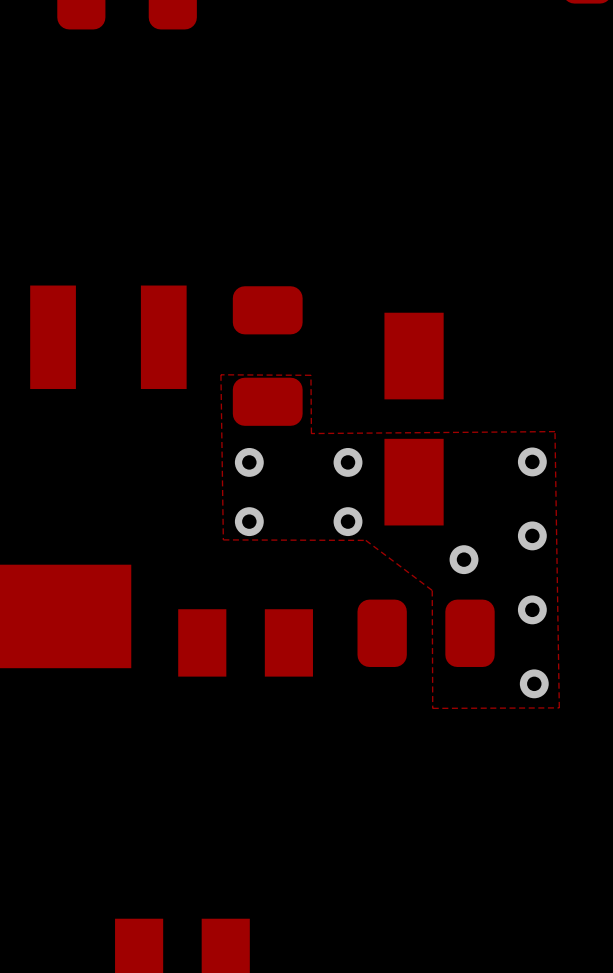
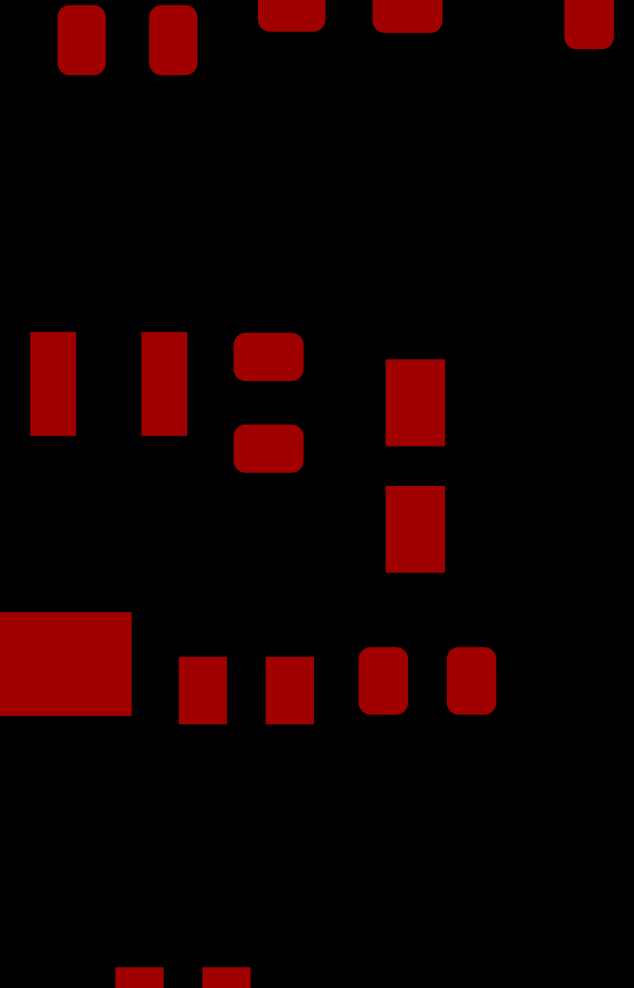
top zone outline: (220, 374) (310, 375) (311, 433) (554, 431) (559, 707) (432, 708) (432, 590) (365, 540) (223, 539) (220, 374) -> none
via: (532, 461) -> none
via: (249, 462) -> none
via: (348, 462) -> none
via: (249, 521) -> none
via: (348, 521) -> none
via: (532, 535) -> none
via: (464, 559) -> none
via: (532, 609) -> none
via: (534, 683) -> none

